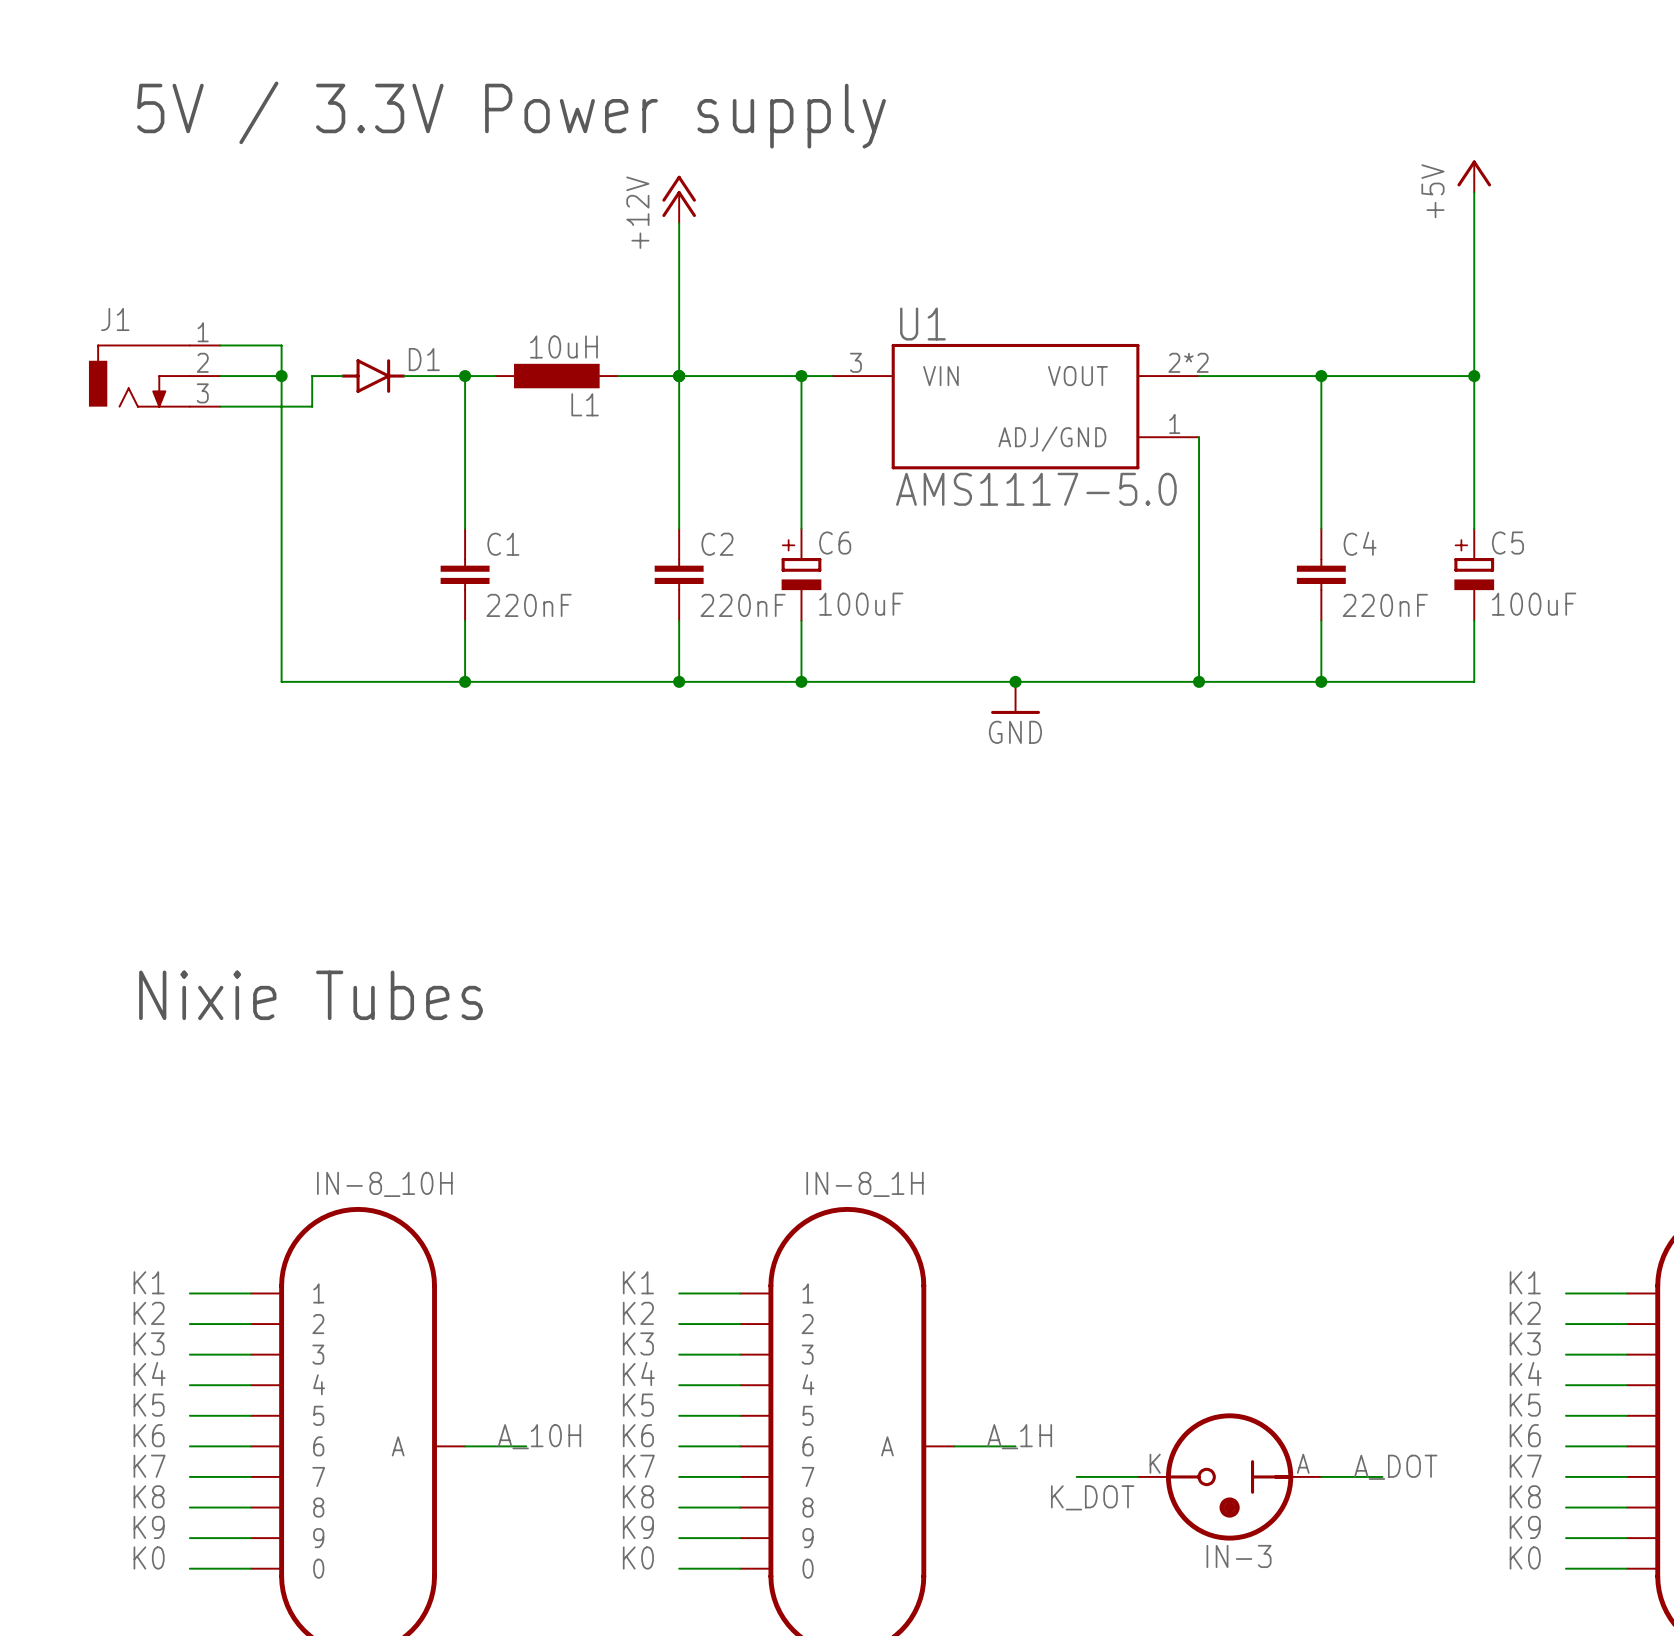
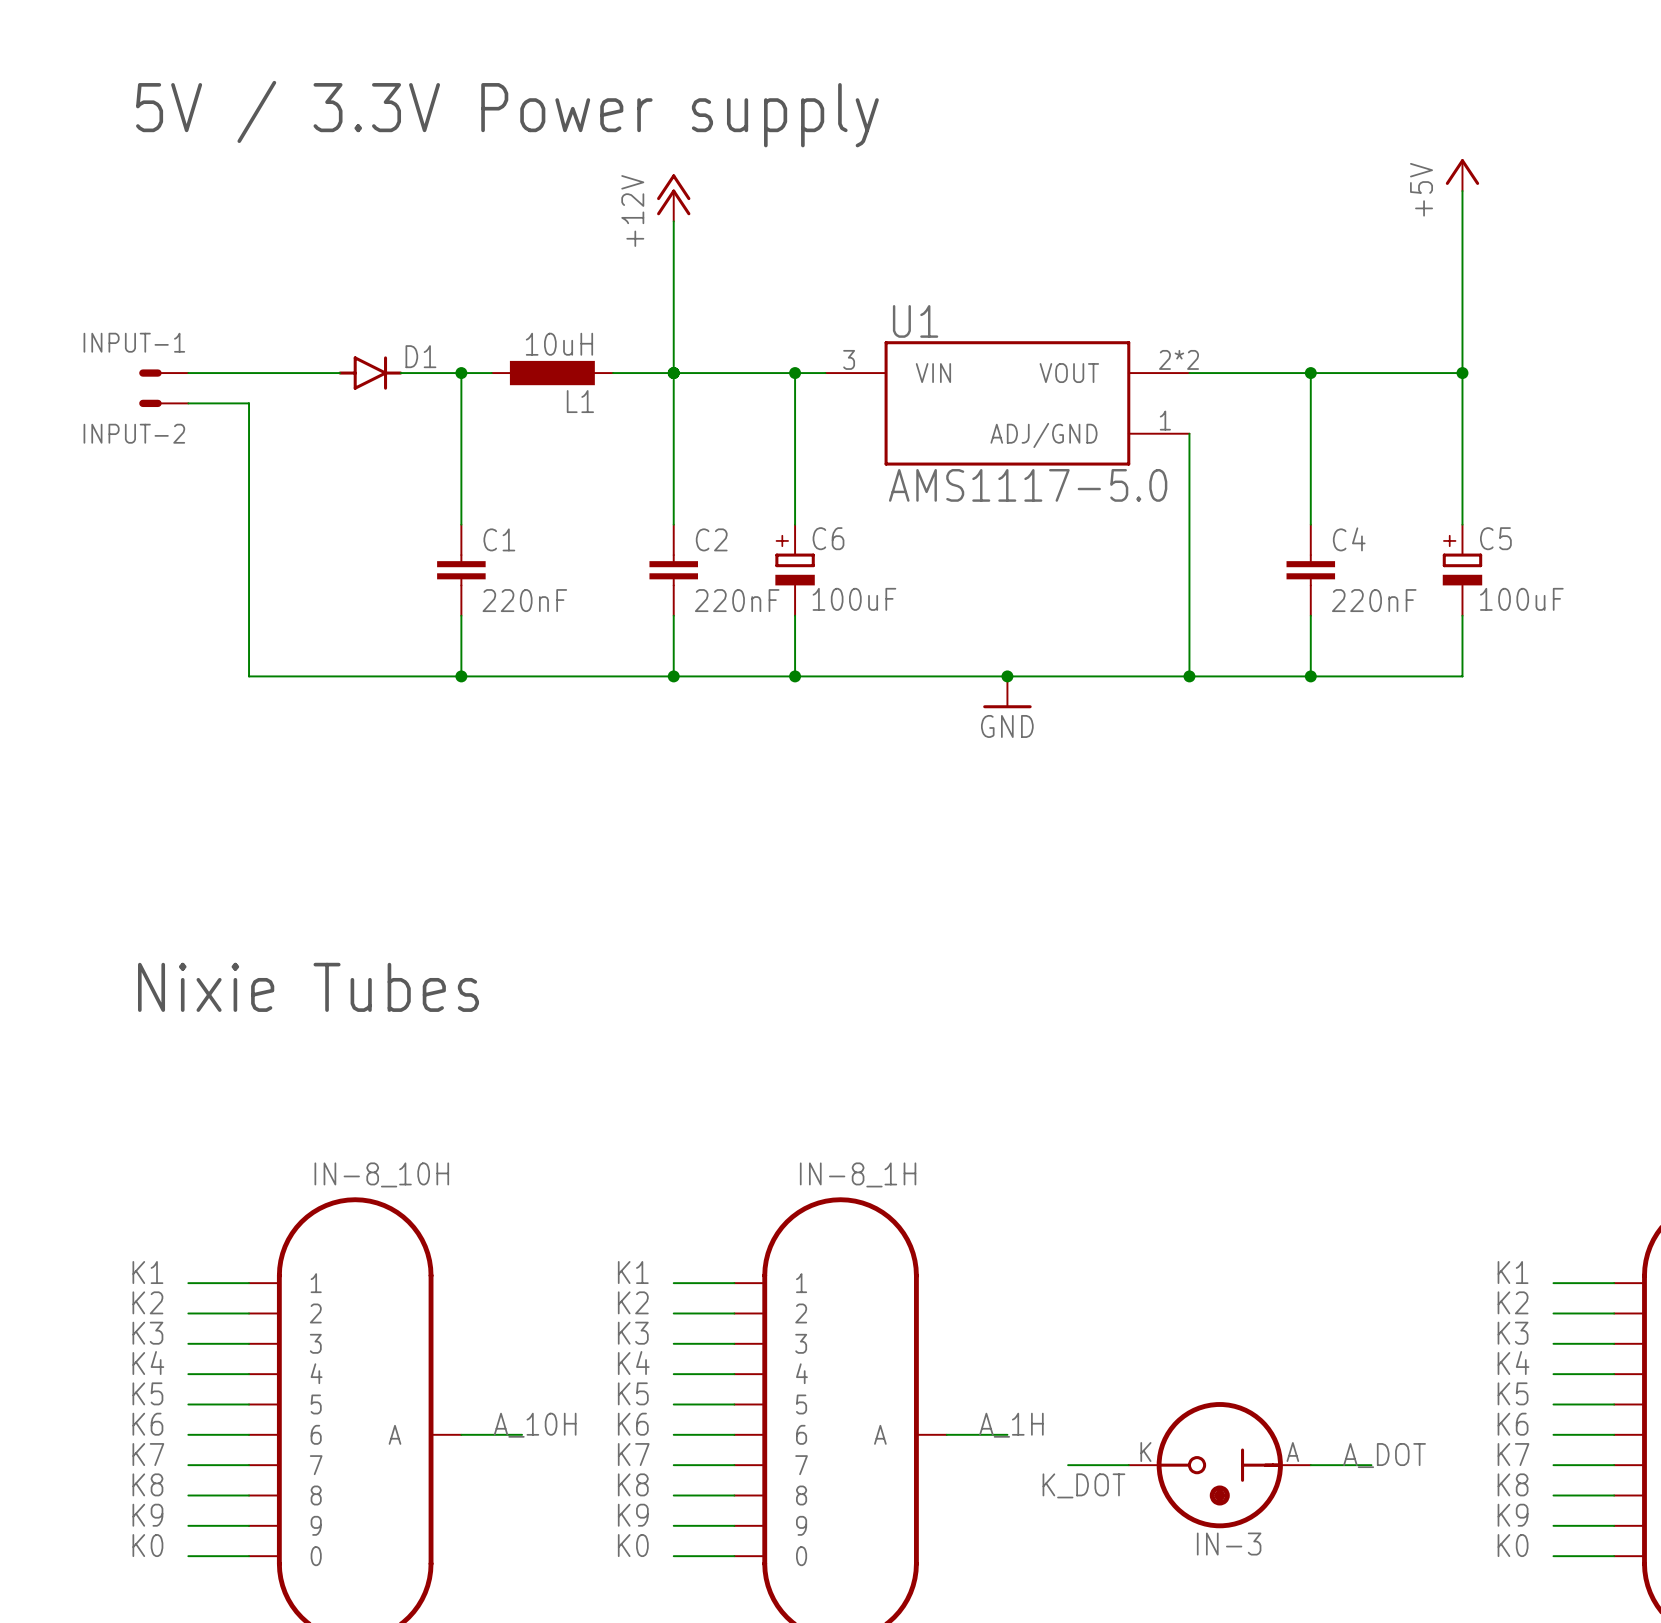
wire: (220, 345) (281, 345) (281, 681) -> (249, 403) (249, 676) (279, 676)
J1: (154, 376) -> none
INPUT-1: none -> (163, 373)
junction: (281, 376) -> none
wire: (312, 376) (312, 406) (251, 406) -> (309, 373) (279, 373)
INPUT-2: none -> (163, 403)

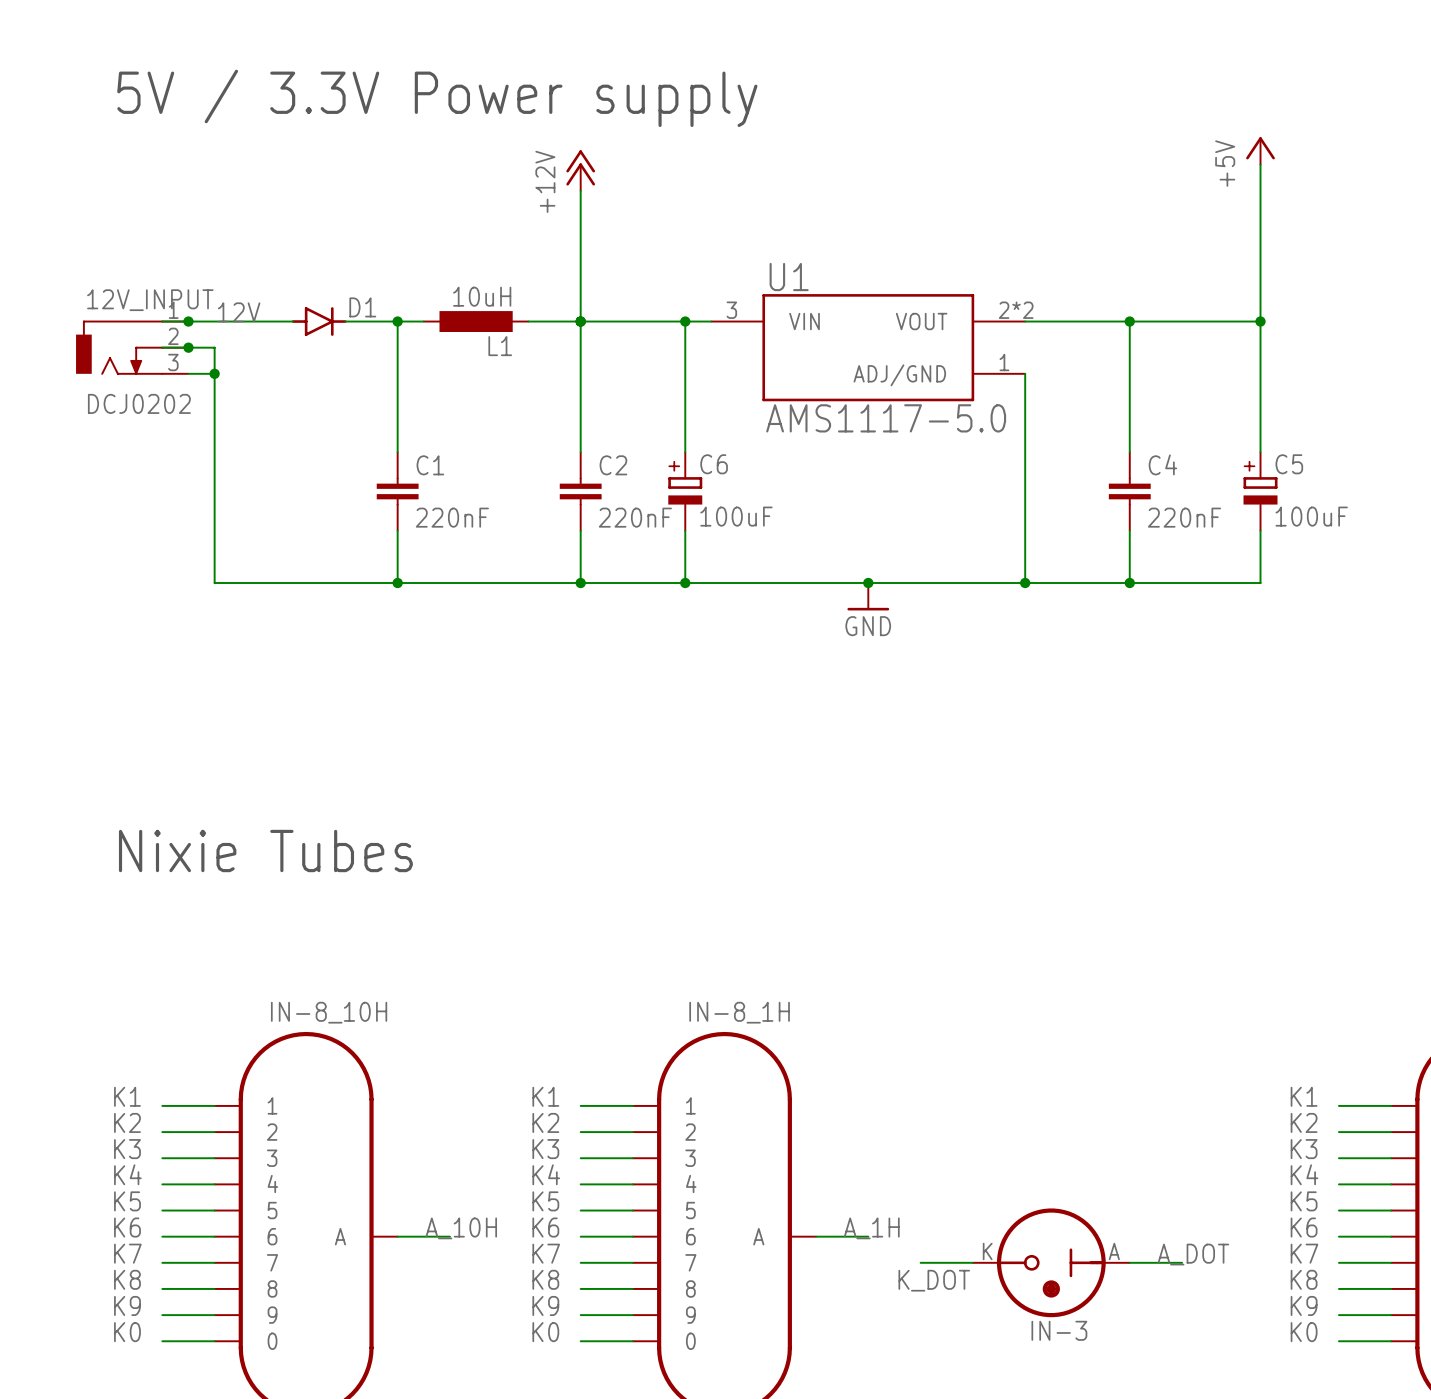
label: none -> 12V (239, 312)
INPUT-1: (163, 373) -> none
junction: none -> (188, 321)
12V_INPUT: none -> DCJ0202 (132, 347)
INPUT-2: (163, 403) -> none
junction: none -> (188, 347)
wire: none -> (188, 373) (214, 373)
junction: none -> (214, 373)

